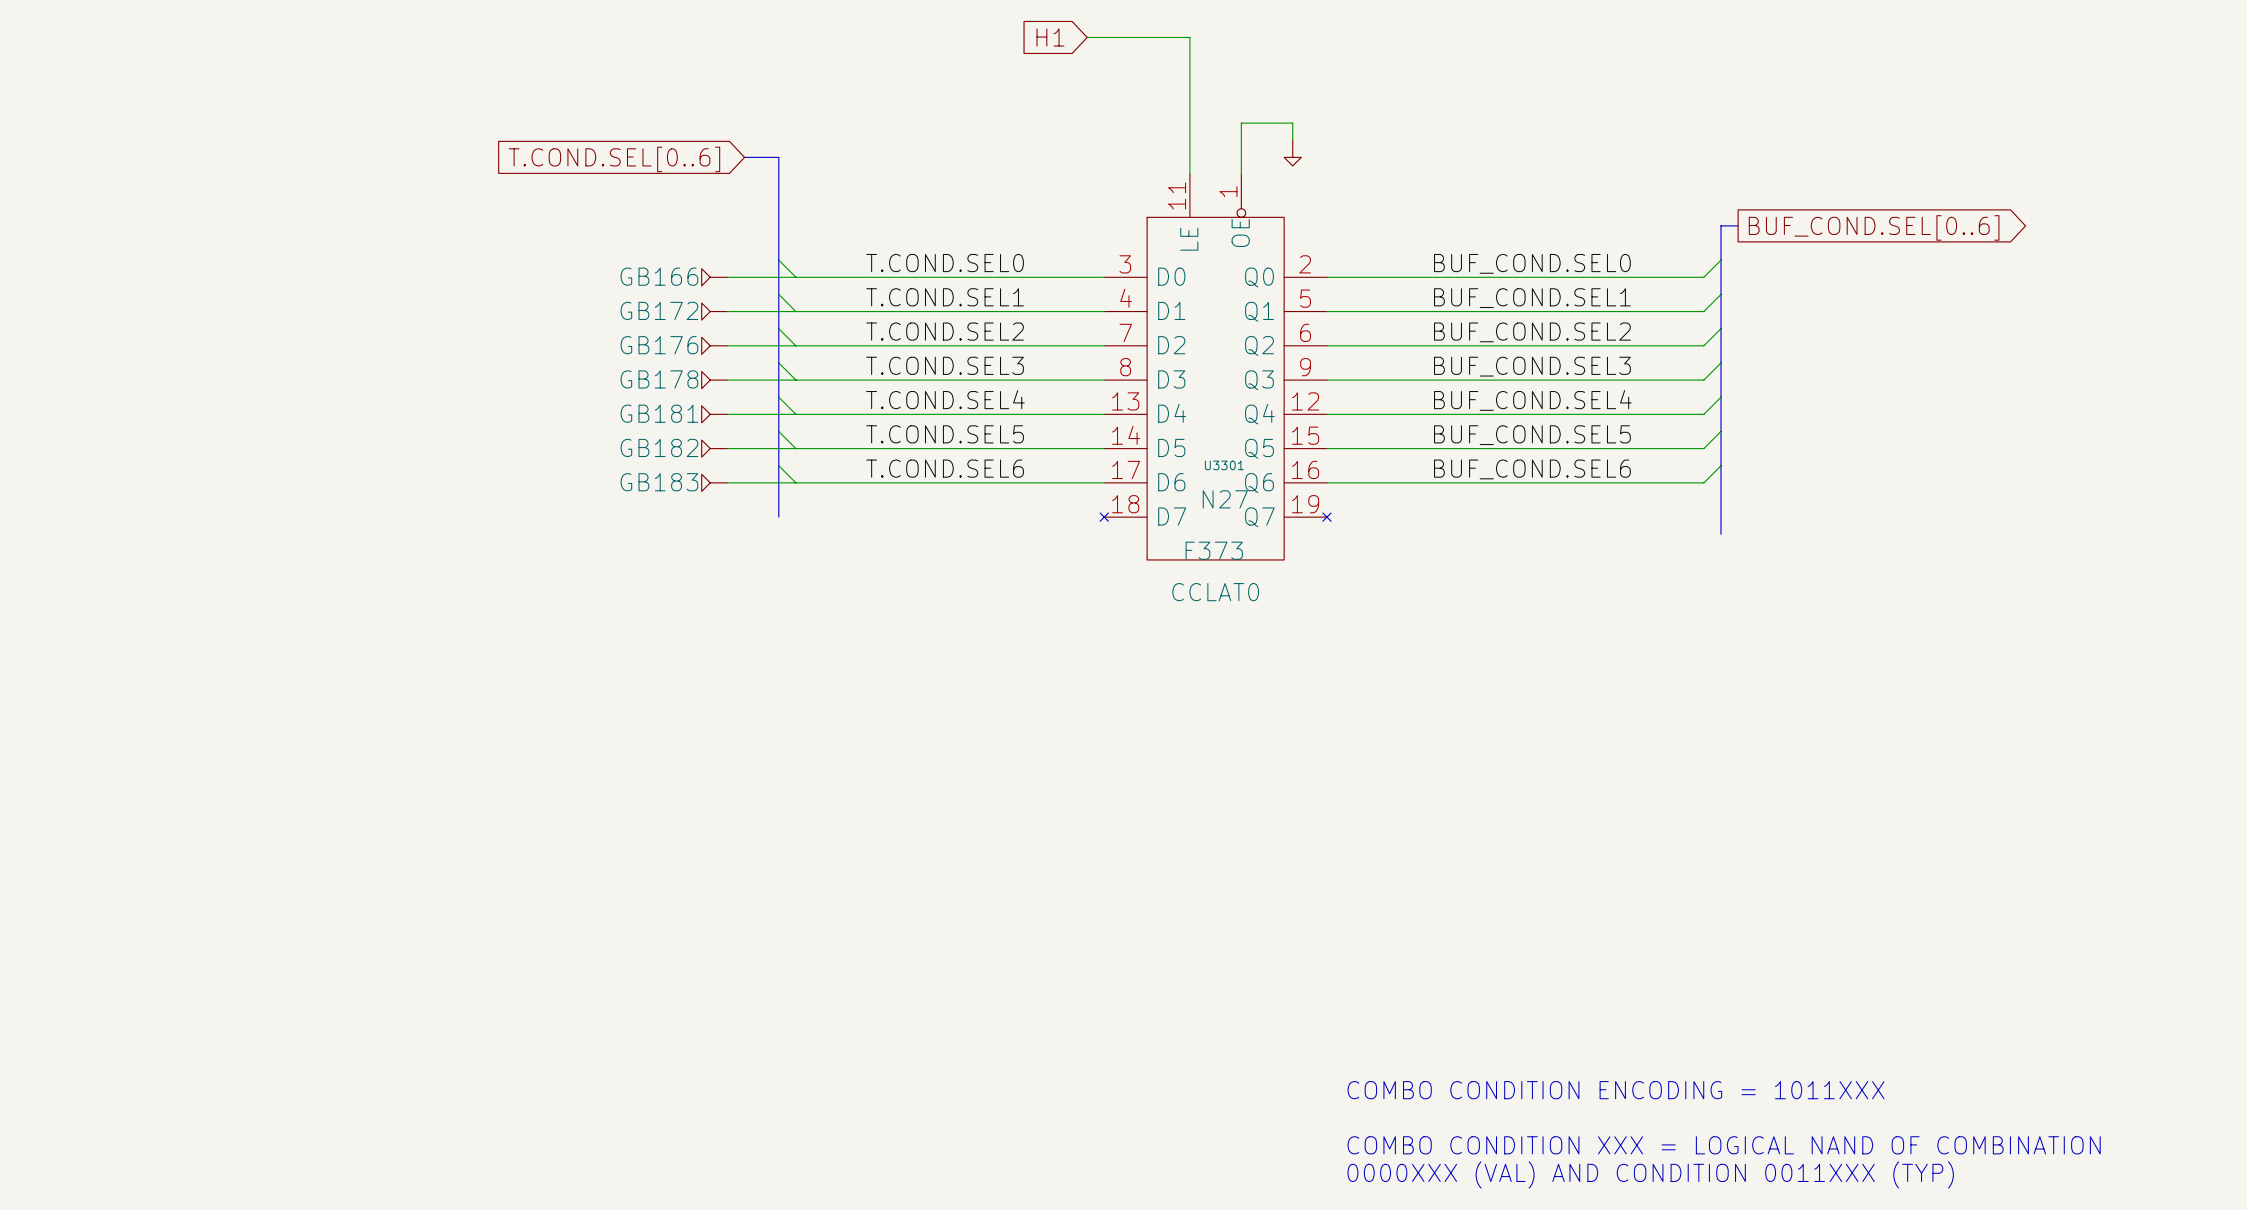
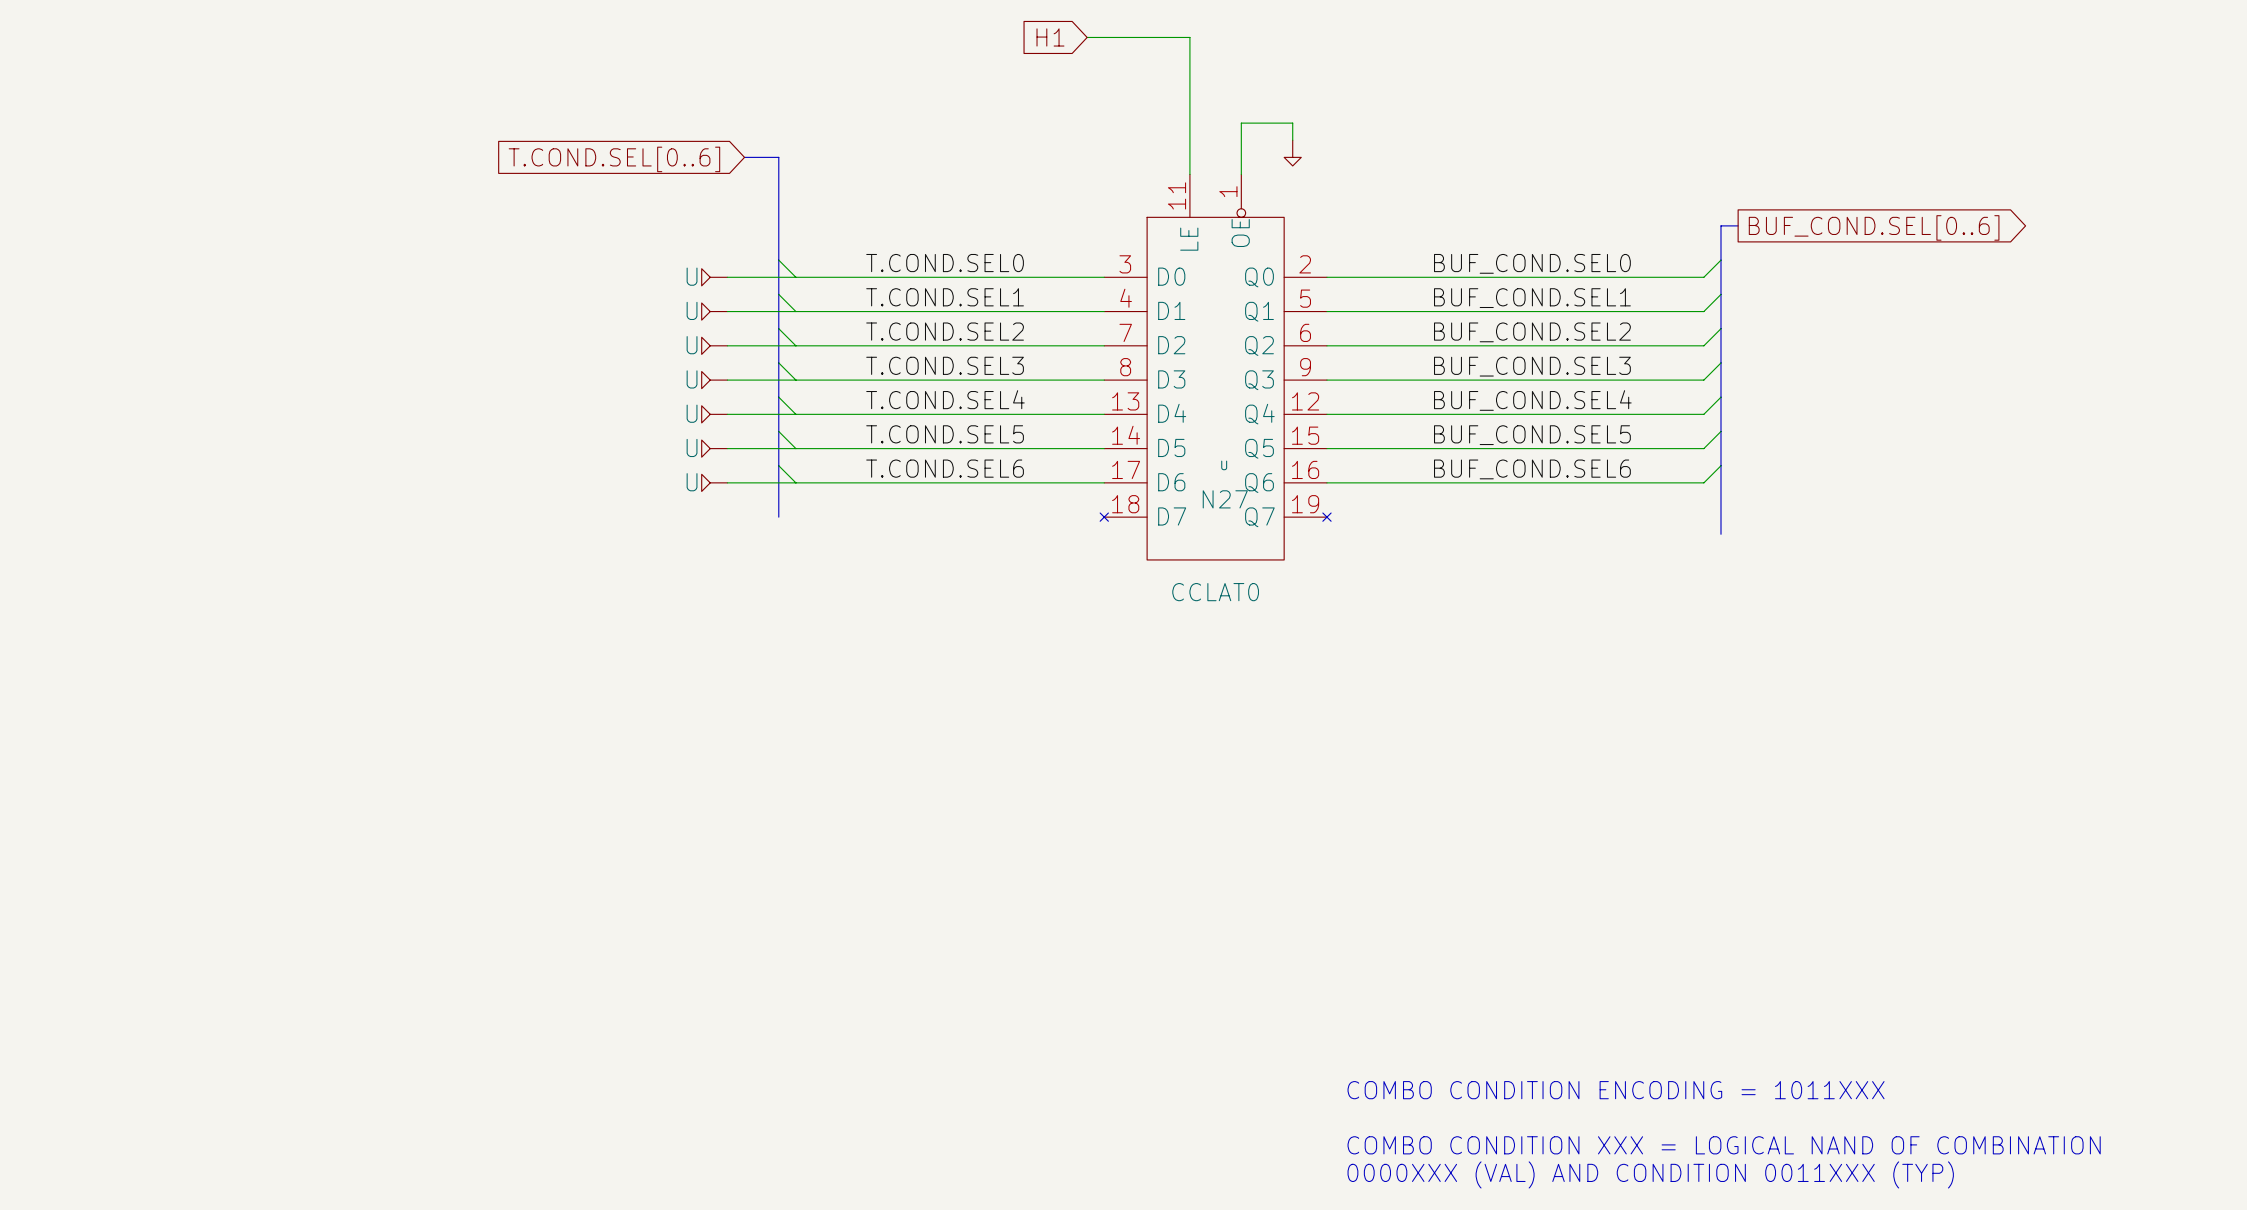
GB166 name: GB166 (659, 276) -> U (692, 276)
GB172 name: GB172 (659, 310) -> U (692, 310)
GB176 name: GB176 (659, 345) -> U (692, 345)
GB178 name: GB178 (659, 379) -> U (692, 379)
GB181 name: GB181 (659, 413) -> U (692, 413)
GB182 name: GB182 (659, 447) -> U (692, 447)
U3301 name: U3301 (1224, 465) -> U (1224, 465)
GB183 name: GB183 (659, 482) -> U (692, 482)
U3301 value: F373 (1214, 550) -> none

